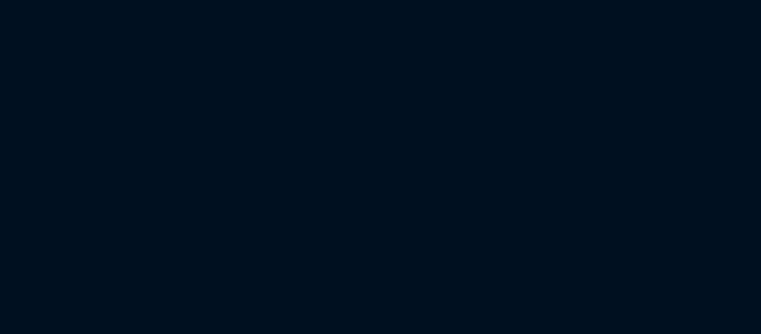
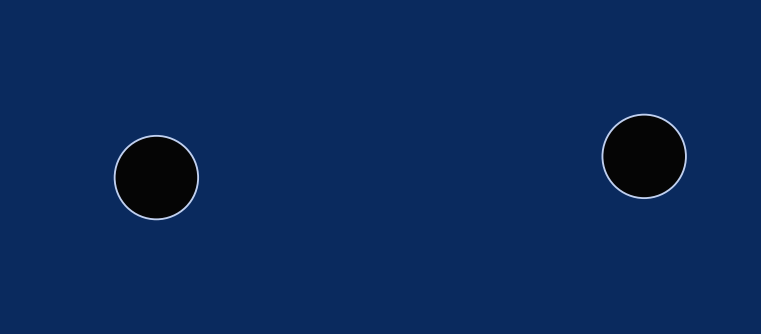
part: none -> (644, 156)
part: none -> (156, 177)

